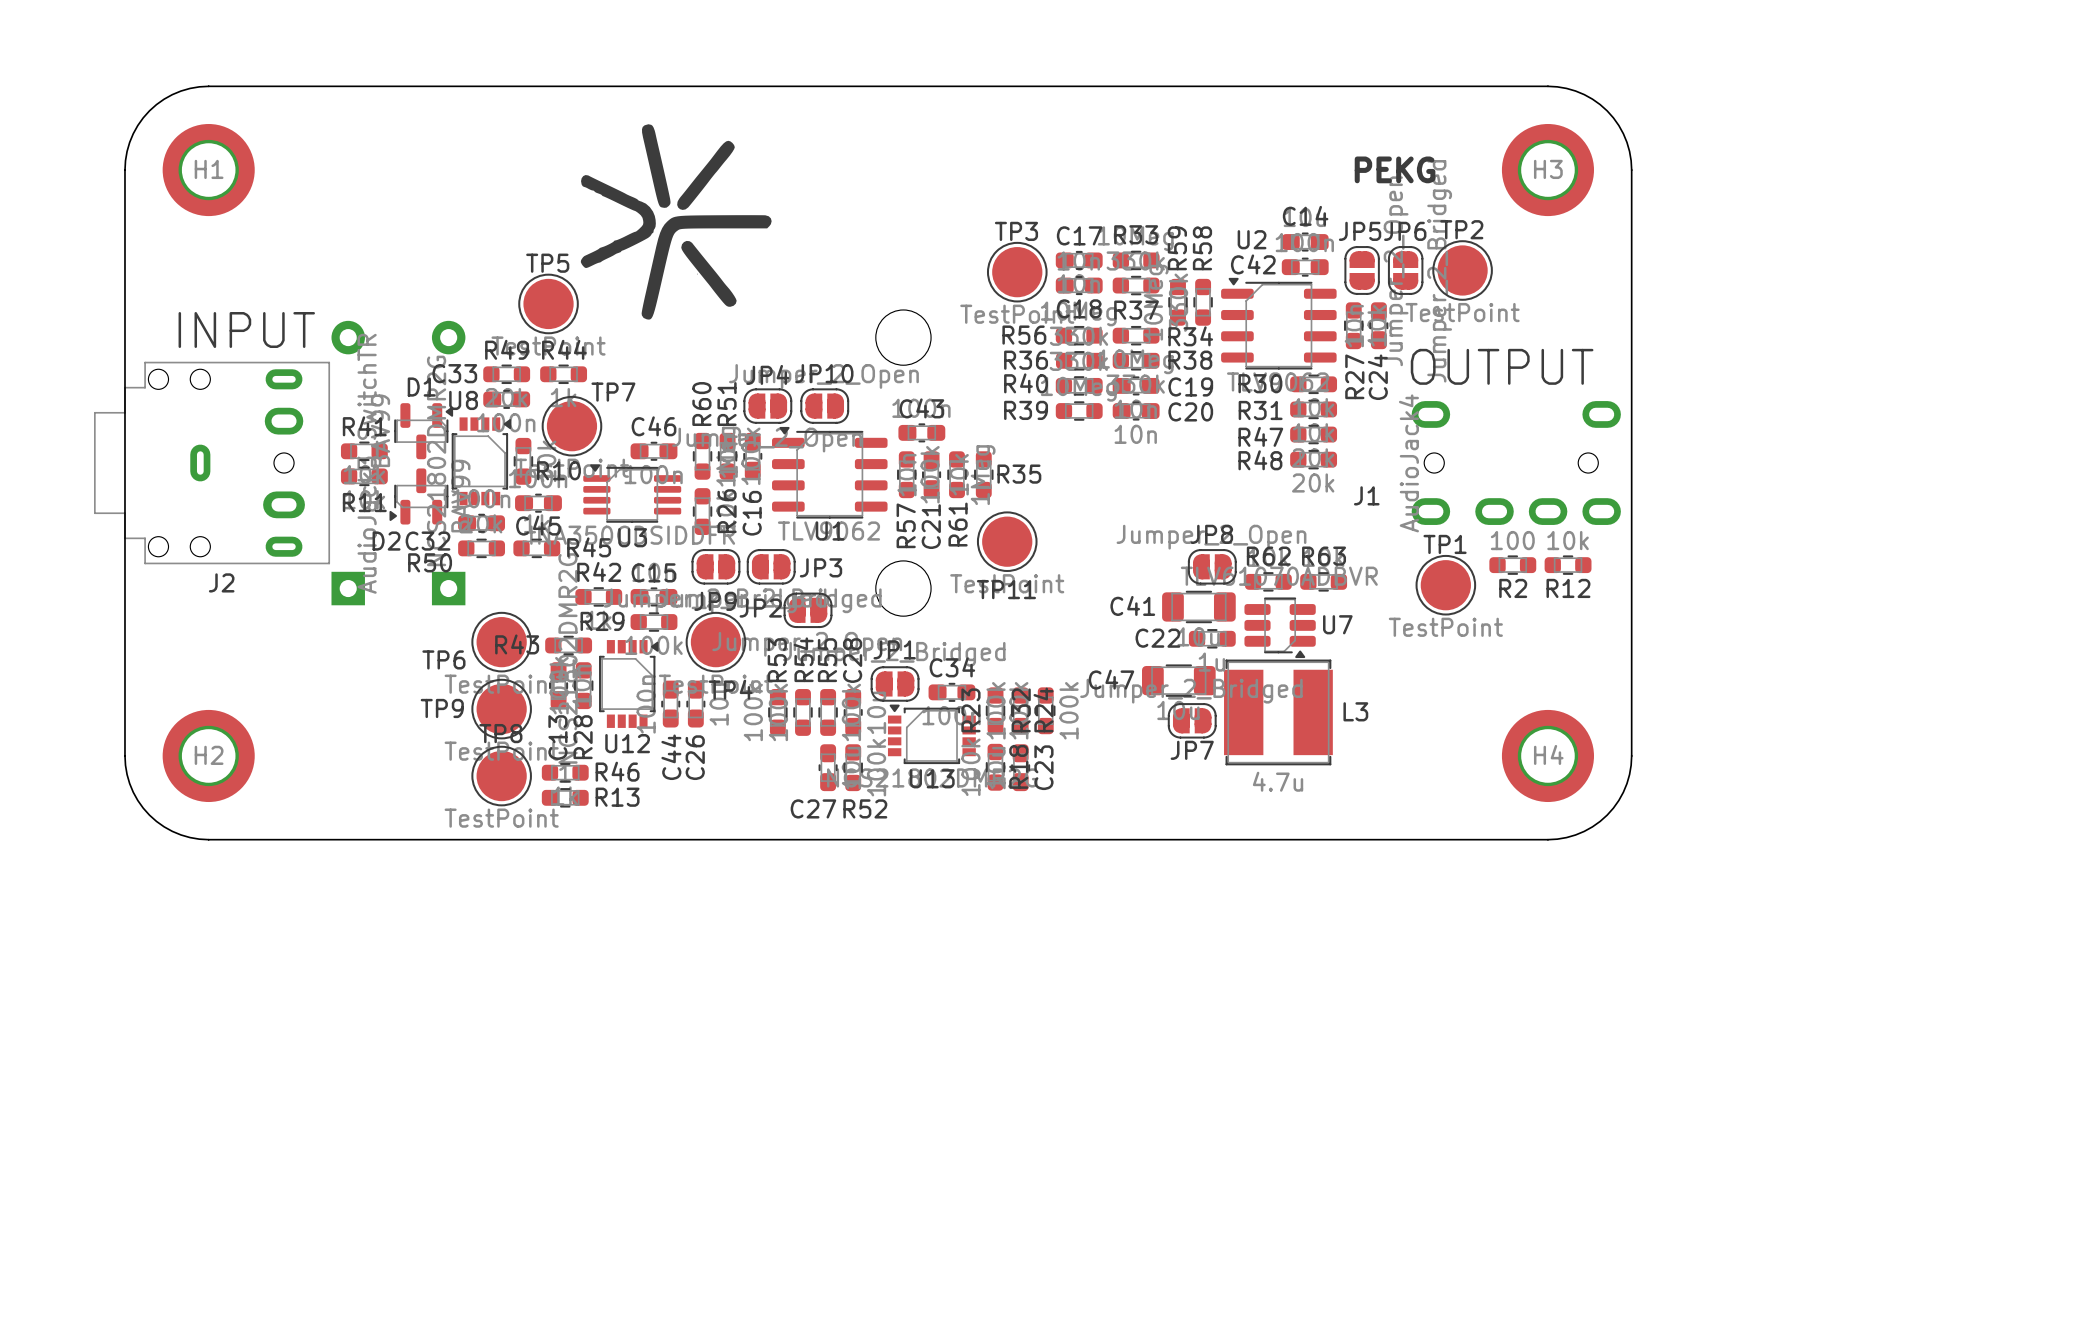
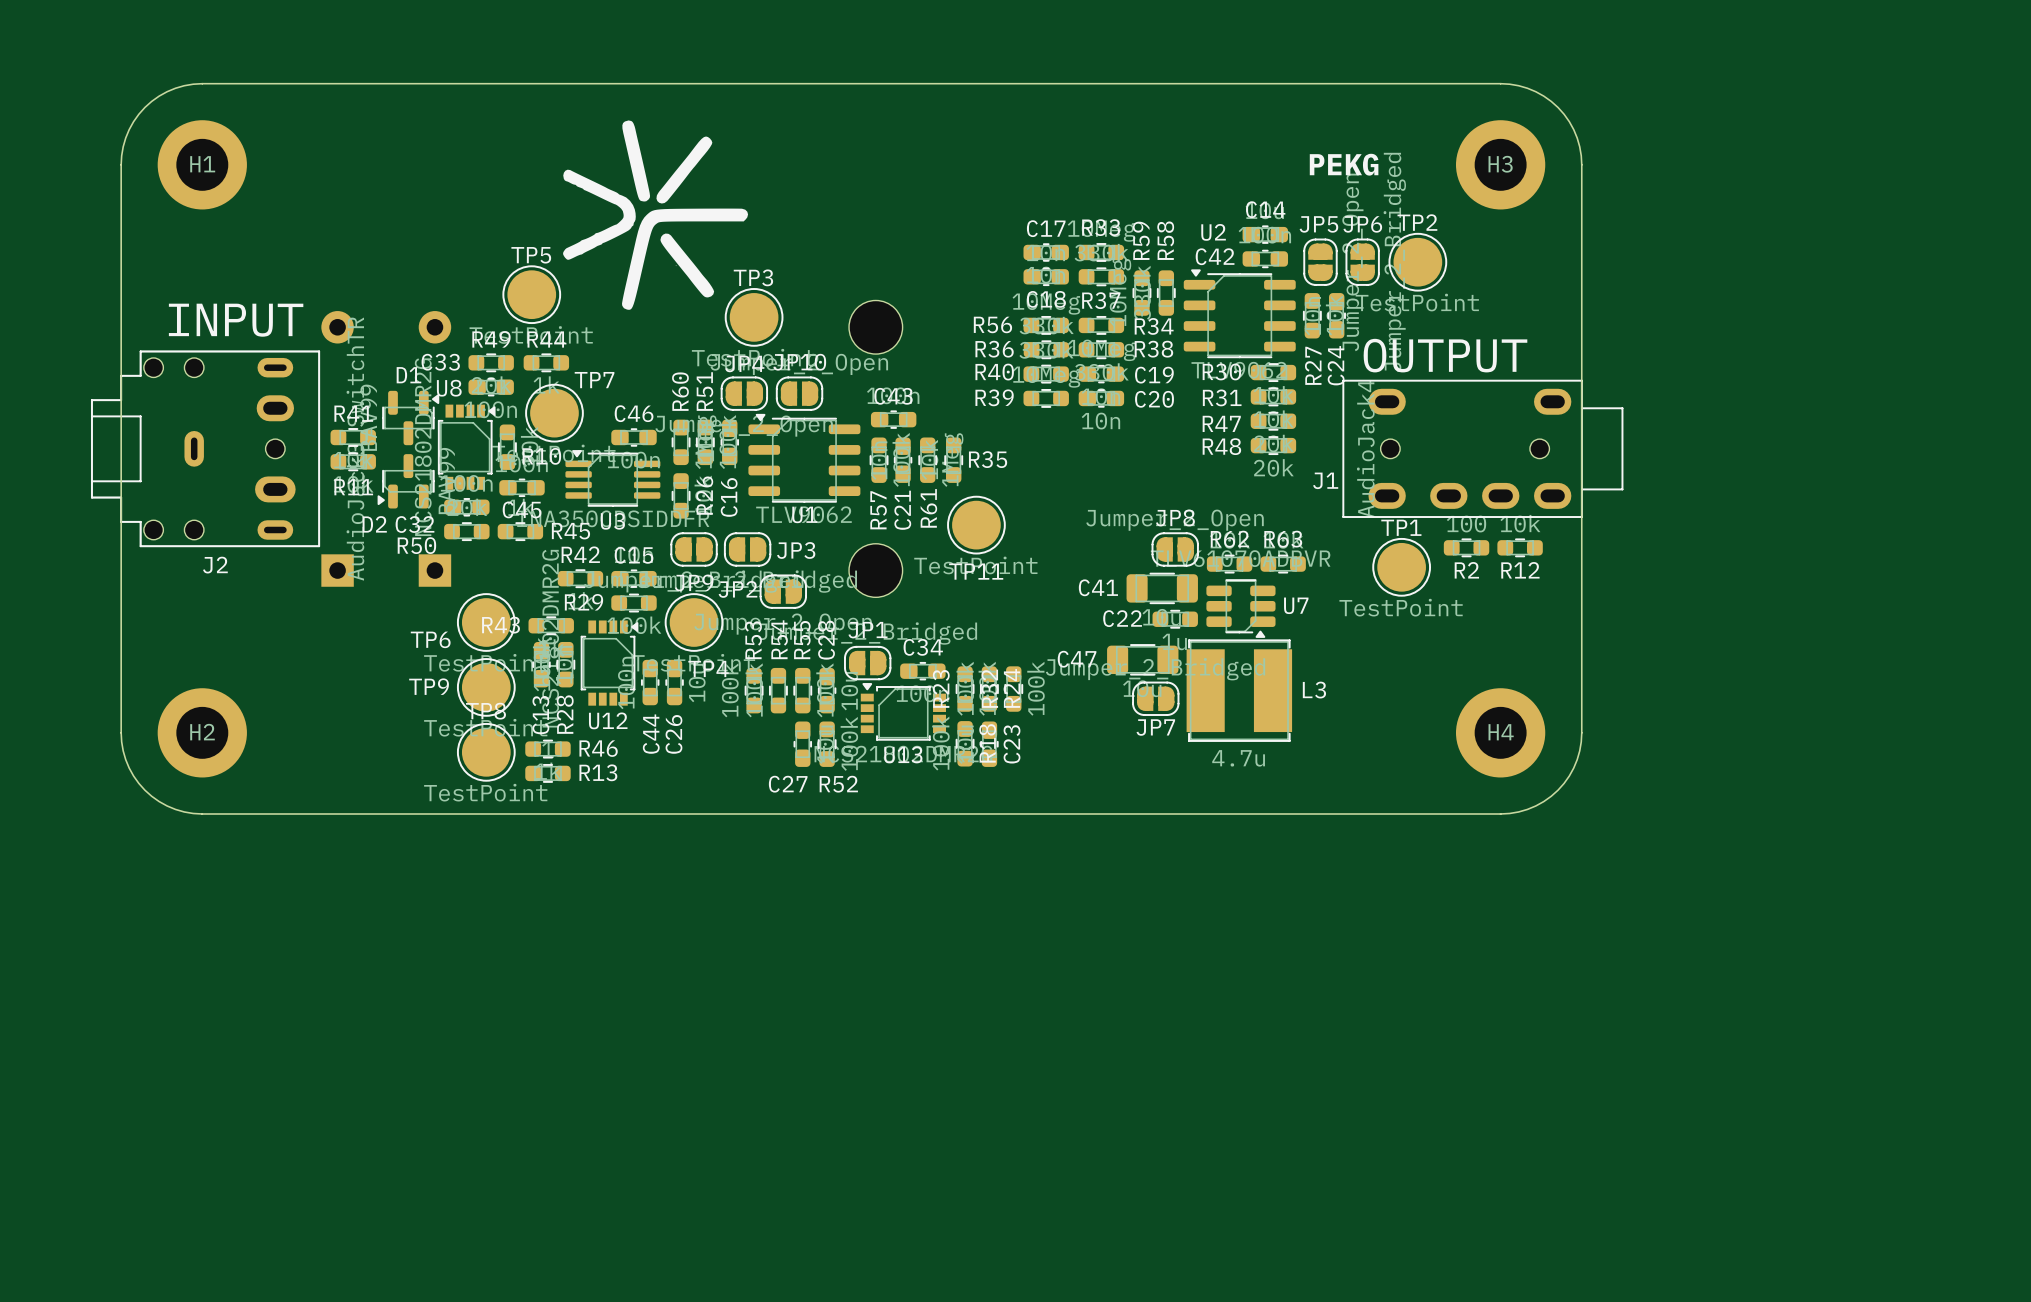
TP3 position: (1017, 272) -> (754, 317)
J2 footprint: [94, 361, 331, 565] -> [90, 350, 321, 548]
J1 footprint: [1411, 401, 1621, 525] -> [1342, 379, 1624, 518]

